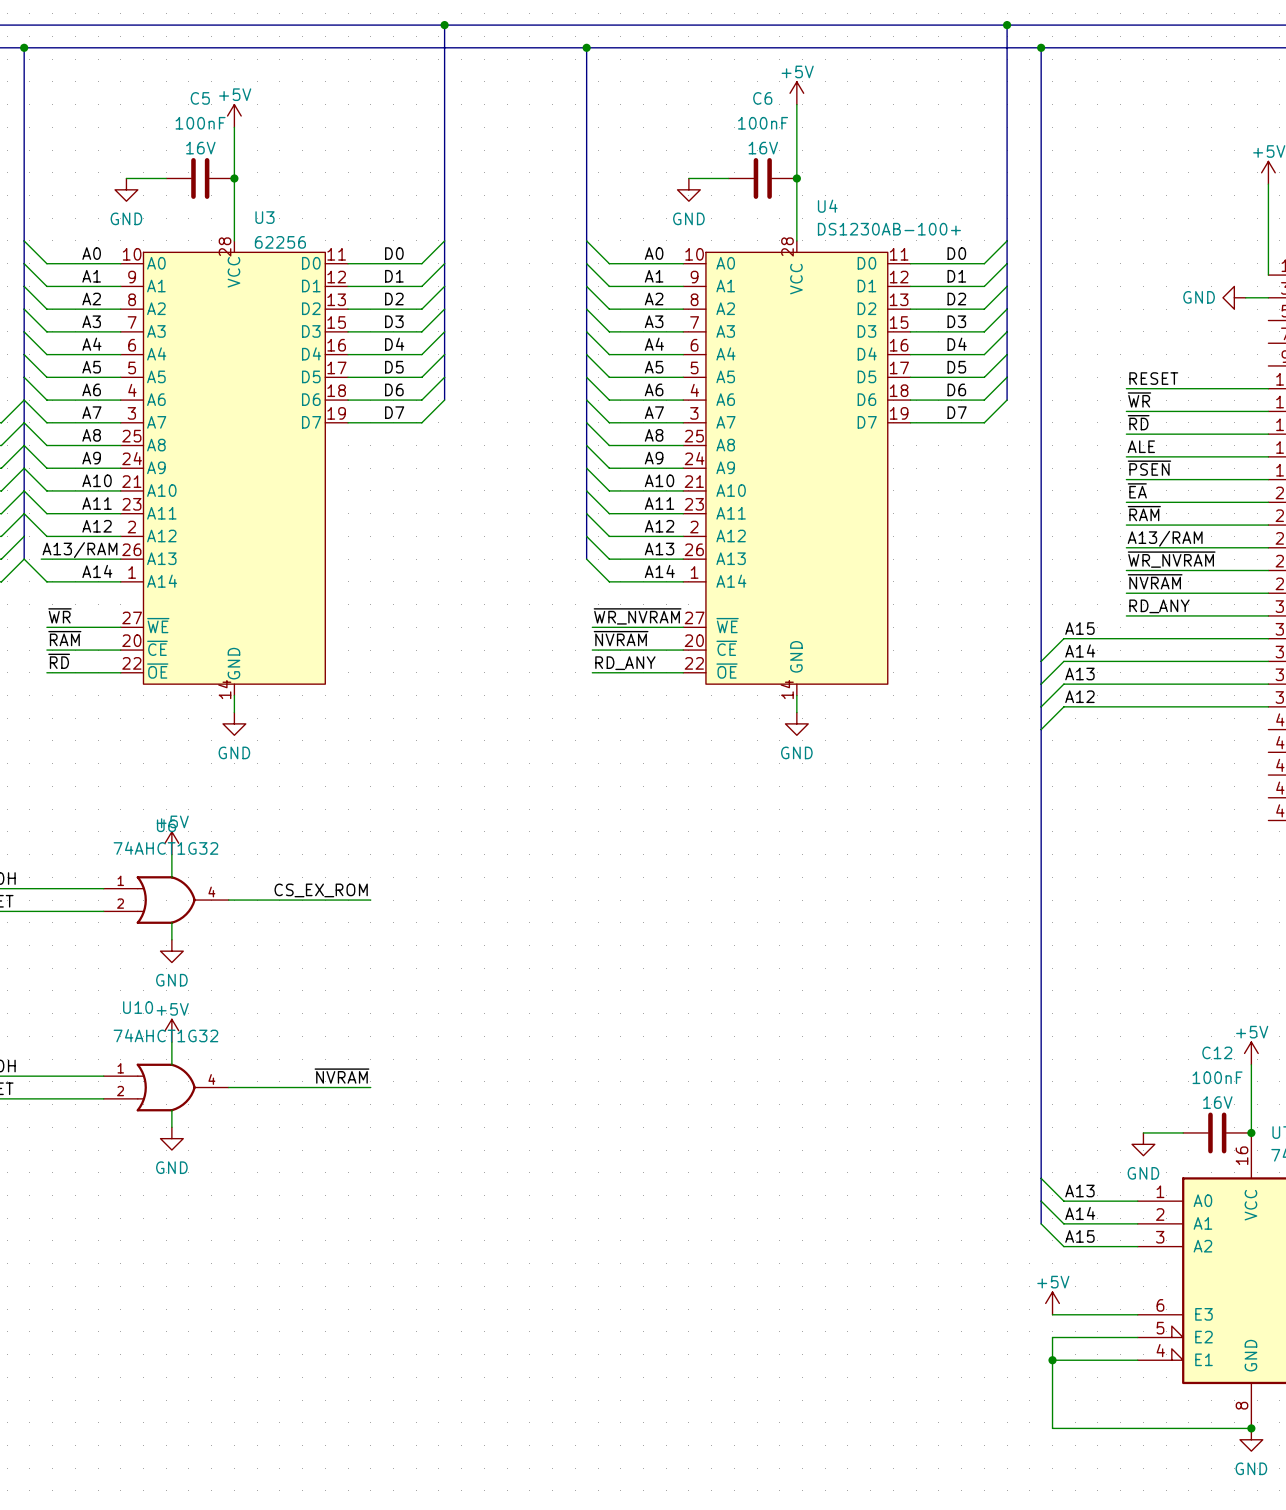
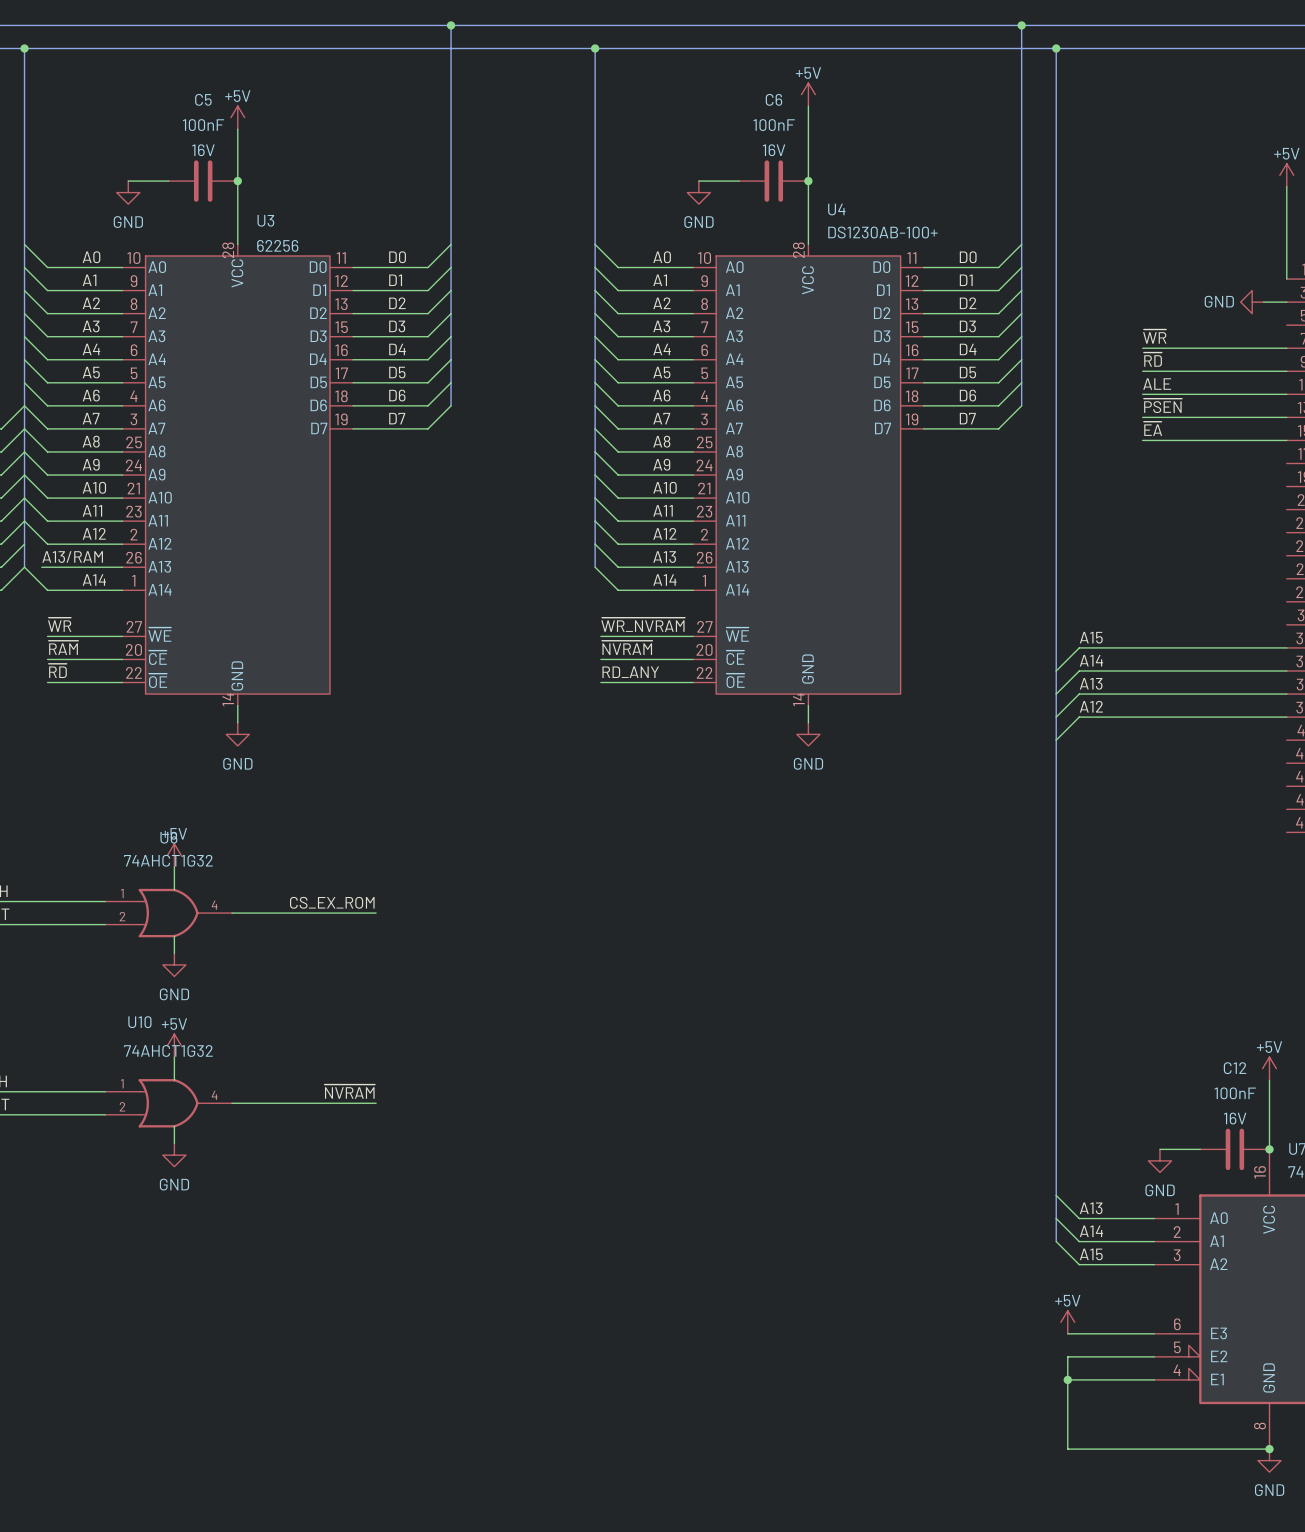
label: none -> ~{WR} (1154, 336)
label: none -> ~{RD} (1152, 359)
label: RESET (1153, 378) -> ALE (1157, 384)
label: ~{WR} (1139, 399) -> ~{PSEN} (1162, 405)
label: ~{RD} (1138, 422) -> ~{EA} (1152, 428)
label: ALE (1141, 446) -> none
wire: (1126, 456) (1268, 456) -> (1142, 348) (1286, 348)
label: ~{PSEN} (1149, 468) -> none
wire: (1126, 479) (1268, 479) -> (1142, 371) (1286, 371)
label: ~{EA} (1137, 490) -> none
wire: (1126, 502) (1268, 502) -> none
label: ~{RAM} (1144, 513) -> none
wire: (1126, 525) (1268, 525) -> none
label: A13/RAM (1165, 538) -> none
wire: (1126, 547) (1268, 547) -> none
label: ~{WR_NVRAM} (1171, 559) -> none
wire: (1126, 570) (1268, 570) -> none
label: ~{NVRAM} (1155, 581) -> none
wire: (1126, 593) (1268, 593) -> none
label: RD_ANY (1159, 606) -> none
wire: (1126, 615) (1268, 615) -> none

